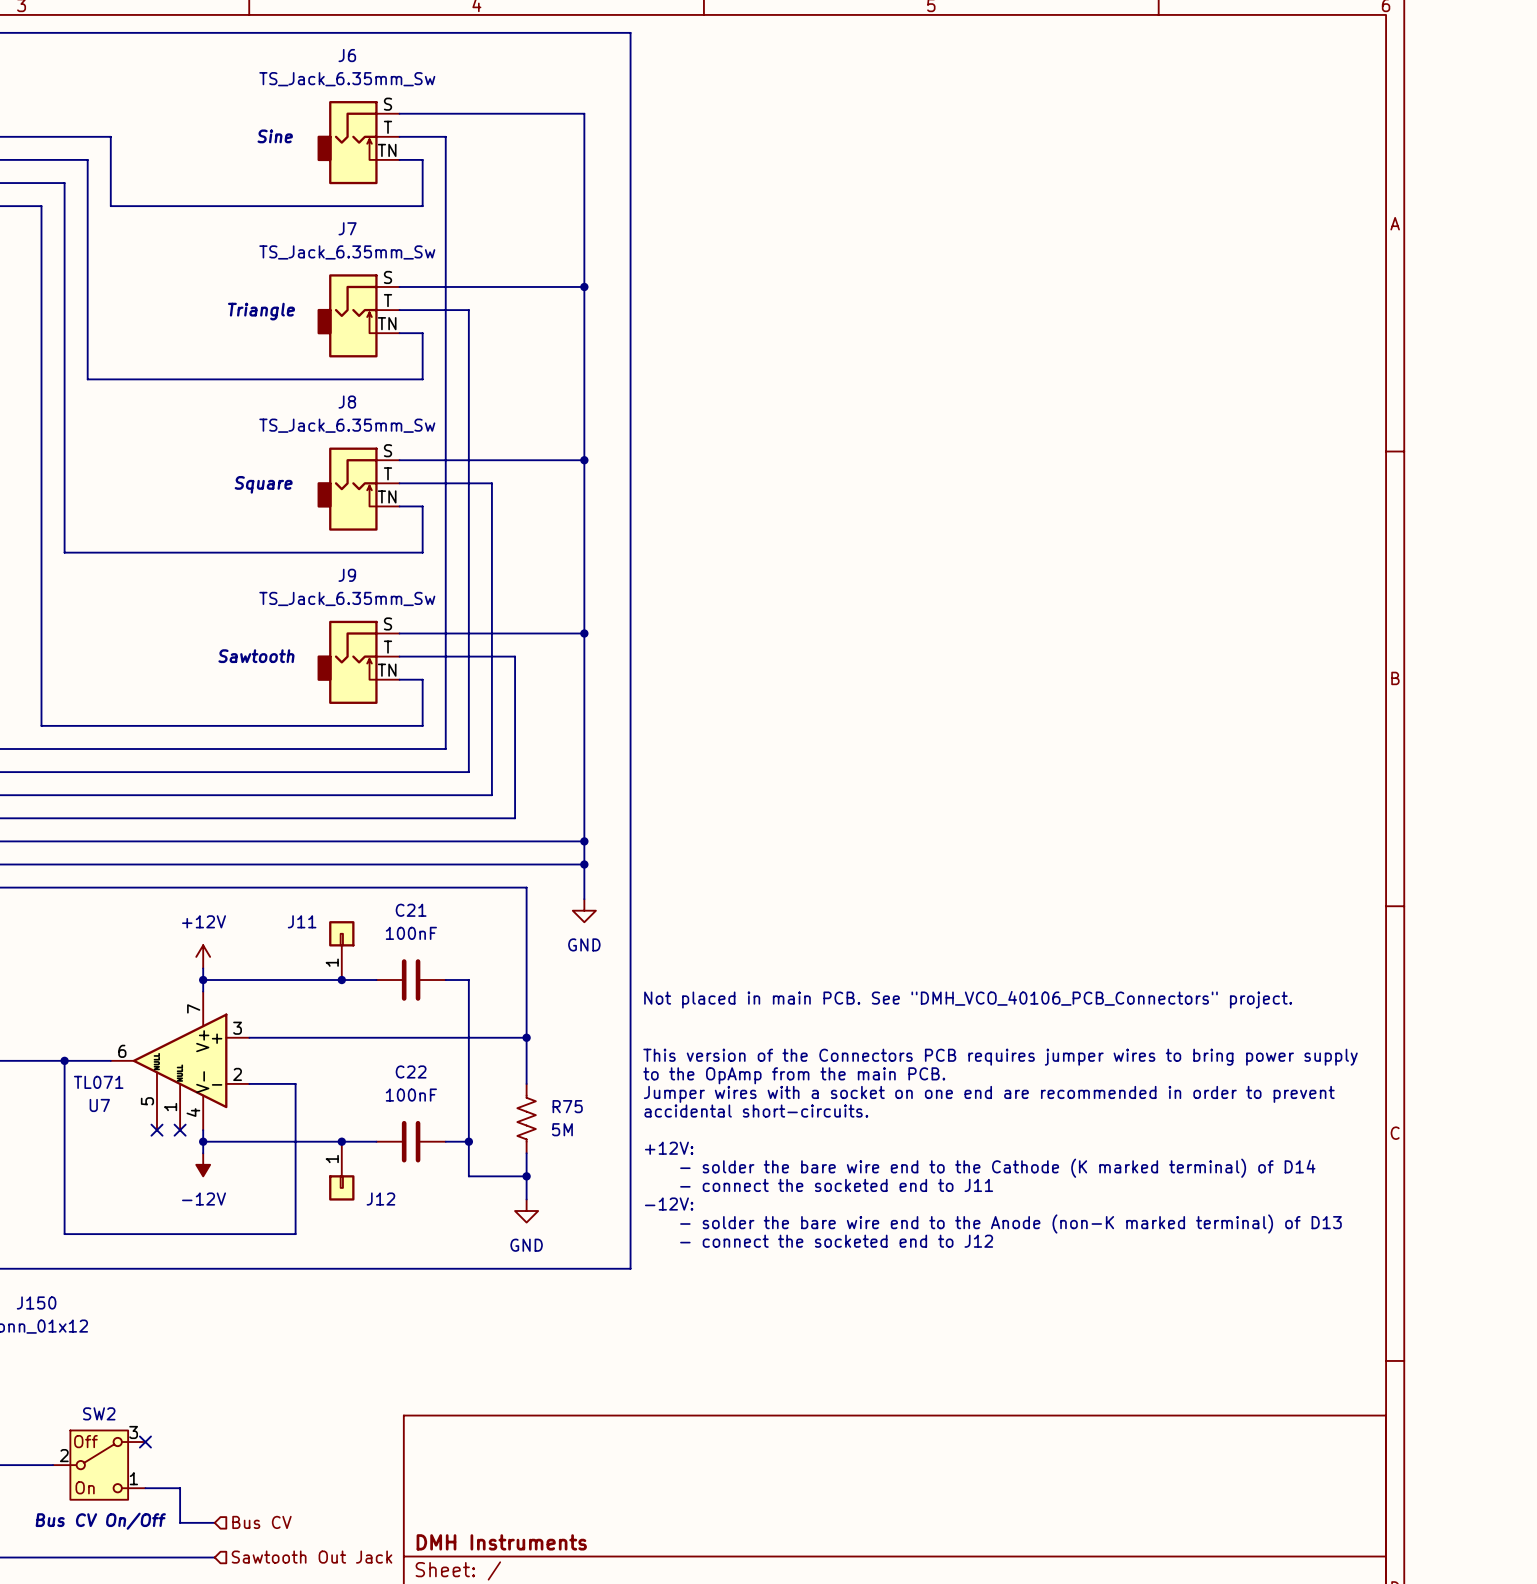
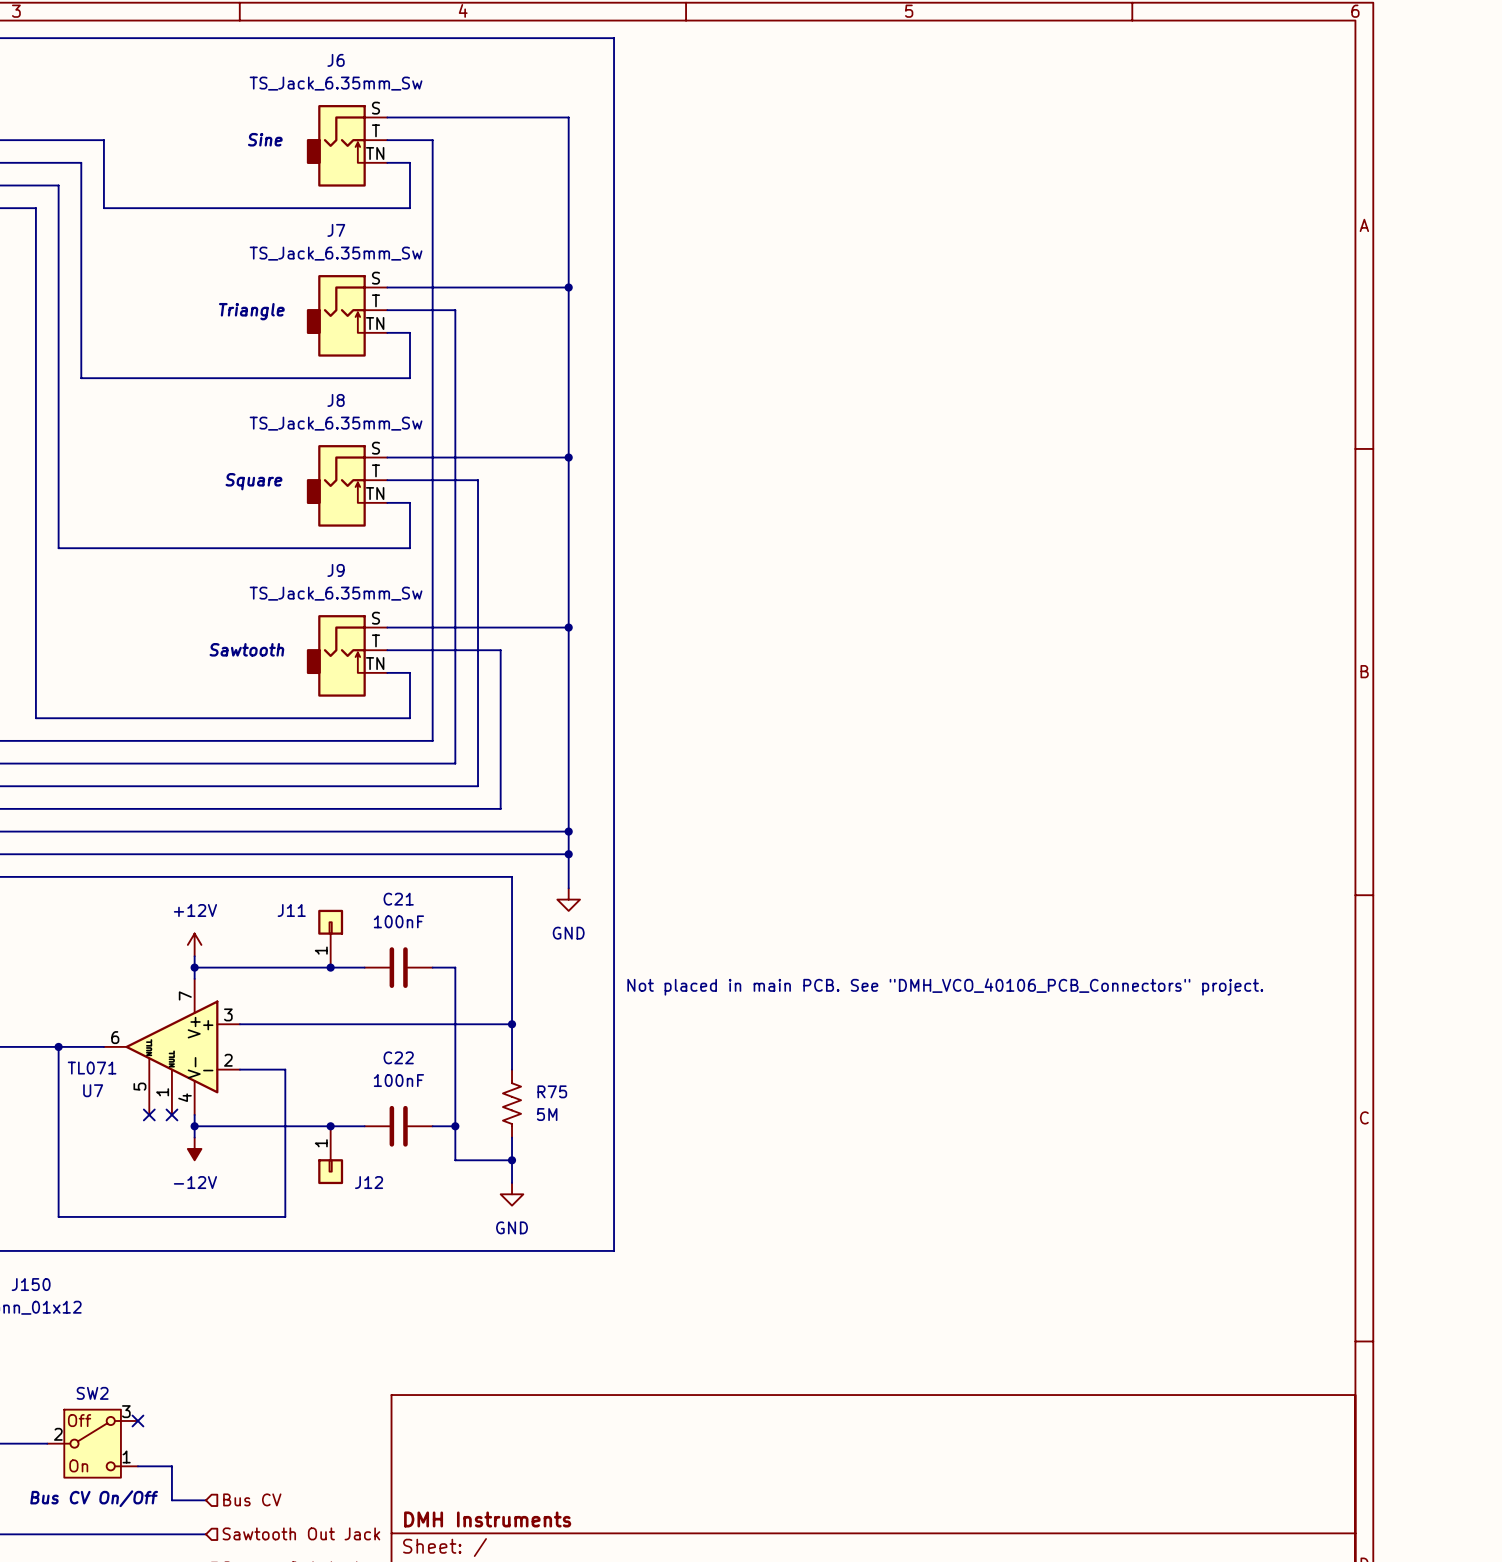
text: This version of the Connectors PCB requires jumper wires to bring power supply (1000, 1057) -> none
text: to the OpAmp from the main PCB. (794, 1075) -> none
text: Jumper wires with a socket on one end are recommended in order to prevent (989, 1094) -> none
text: accidental short-circuits. (756, 1111) -> none
text: +12V: (669, 1148) -> none
text: - solder the bare wire end to the Cathode (K marked terminal) of D14 (997, 1168) -> none
text: - connect the socketed end to J11 (836, 1185) -> none
text: -12V: (669, 1204) -> none
text: - solder the bare wire end to the Anode (non-K marked terminal) of D13 (1010, 1224) -> none
text: - connect the socketed end to J12 (836, 1241) -> none

